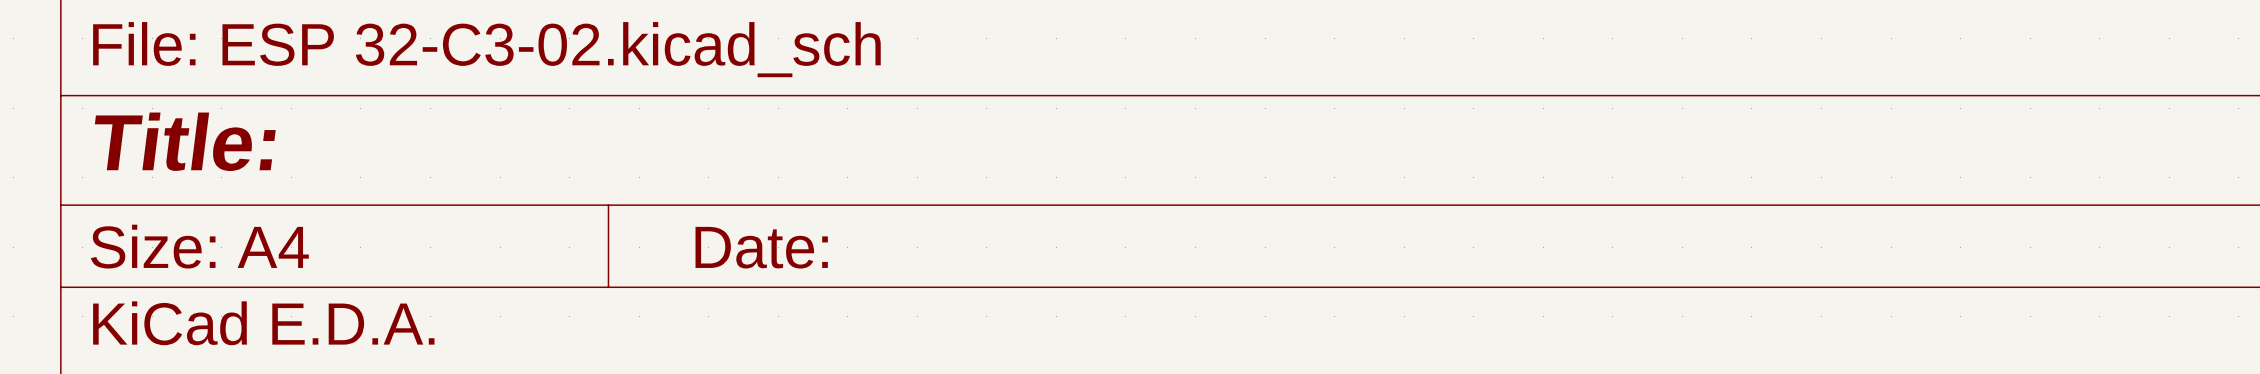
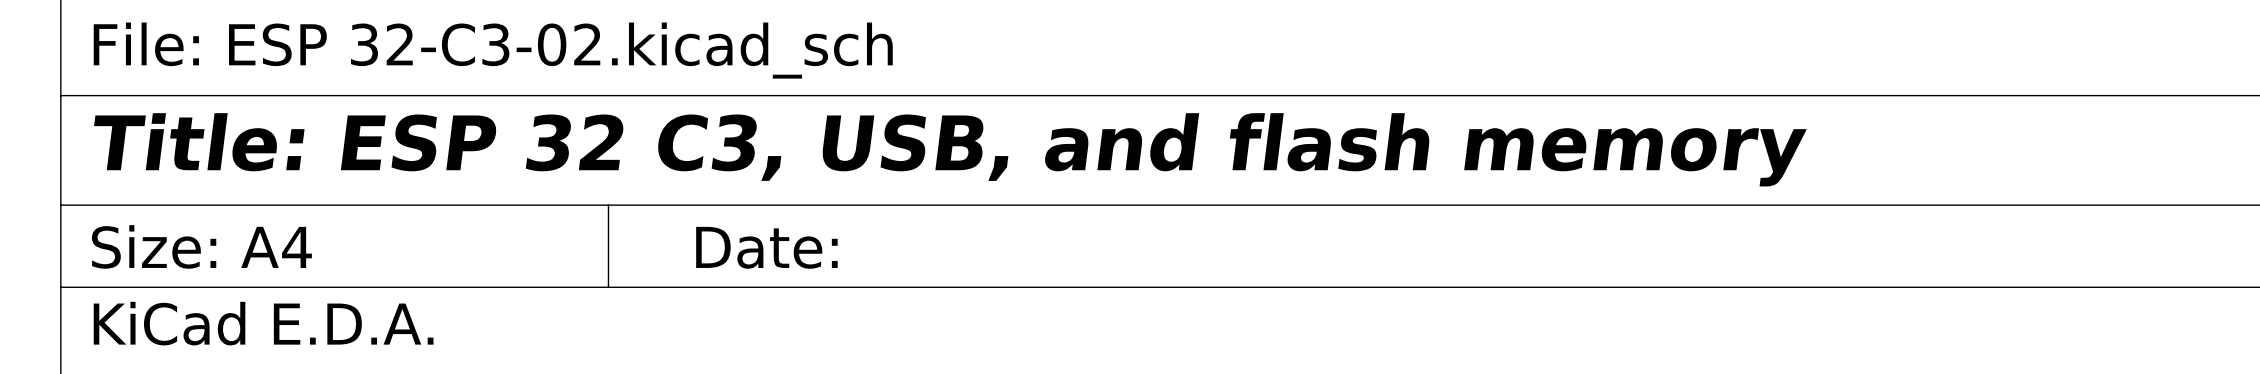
title block: Title: (185, 141) -> Title: ESP 32 C3, USB, and flash memory (950, 149)

